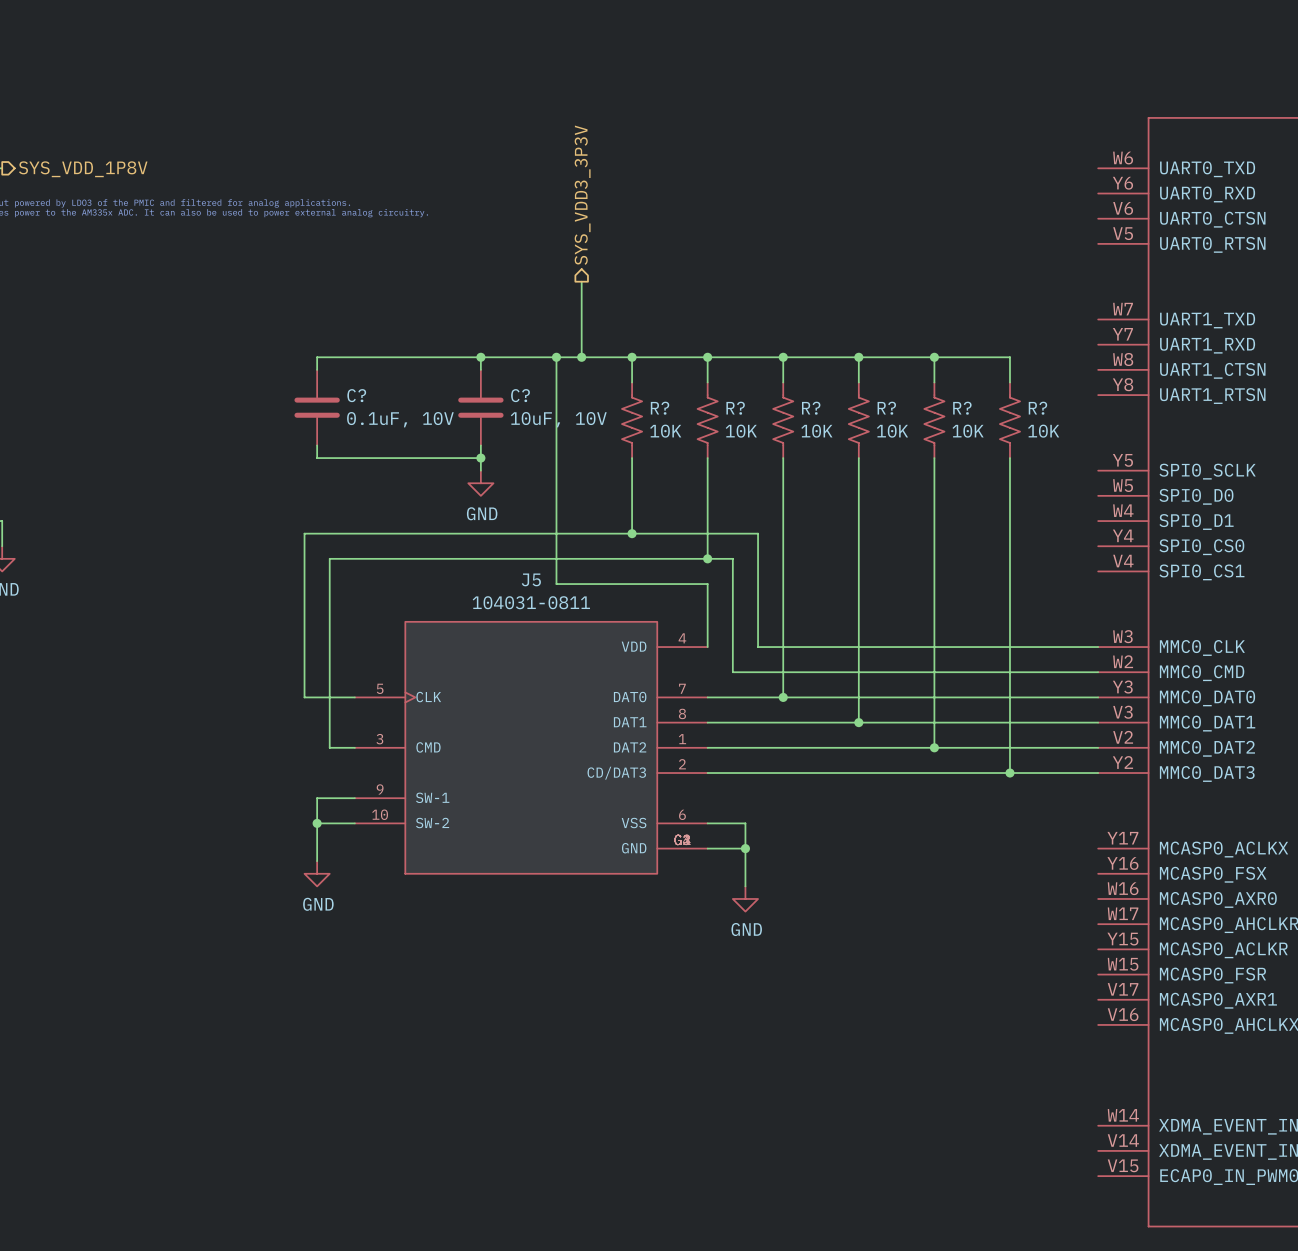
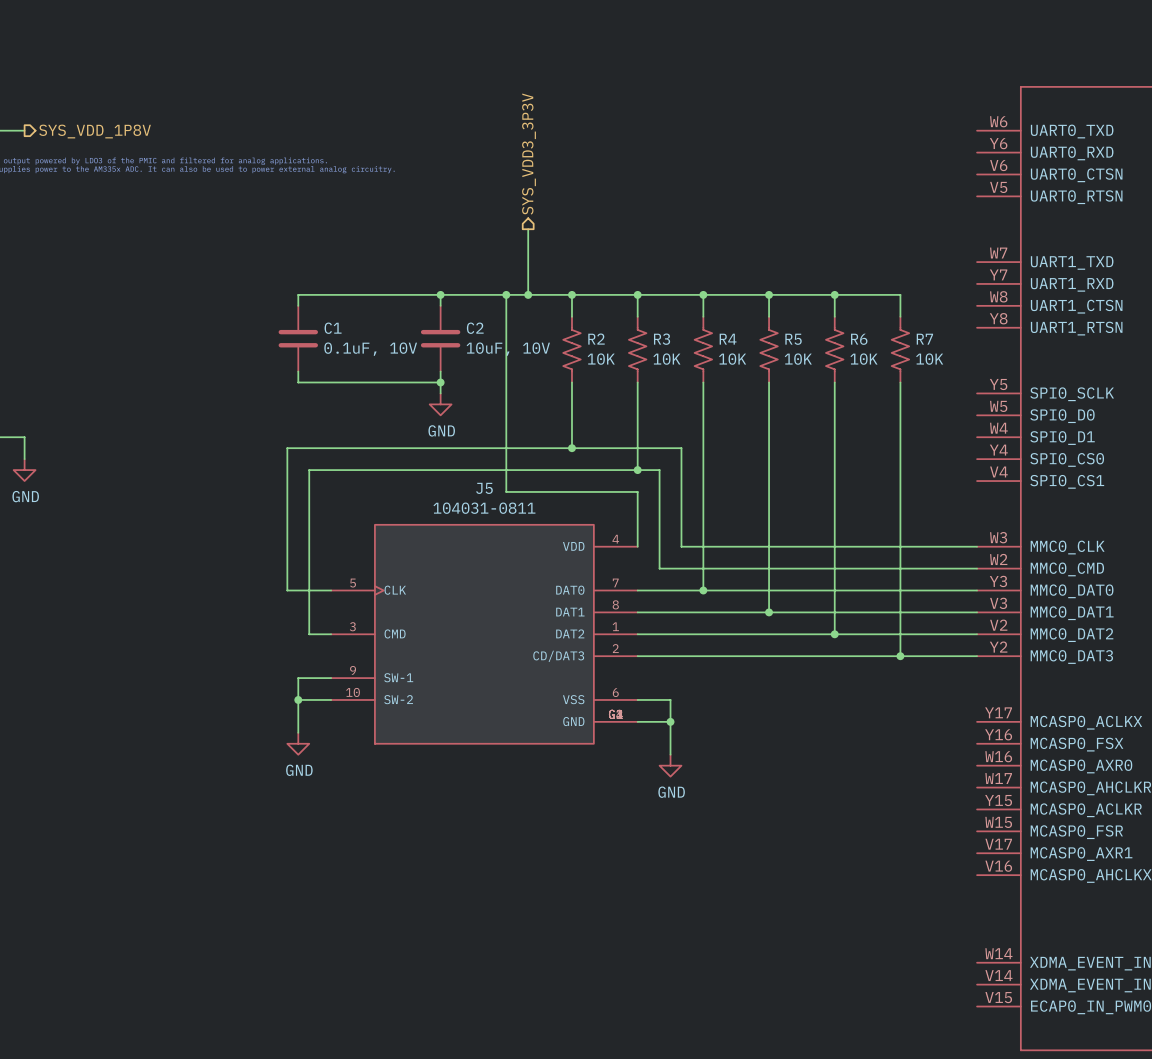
C? name: C? (356, 395) -> C1 (333, 328)
C? name: C? (520, 395) -> C2 (475, 328)
R? name: R? (660, 408) -> R2 (596, 339)
R? name: R? (735, 408) -> R3 (662, 339)
R? name: R? (811, 408) -> R4 (728, 339)
R? name: R? (886, 408) -> R5 (793, 339)
R? name: R? (962, 408) -> R6 (859, 339)
R? name: R? (1037, 408) -> R7 (924, 339)

